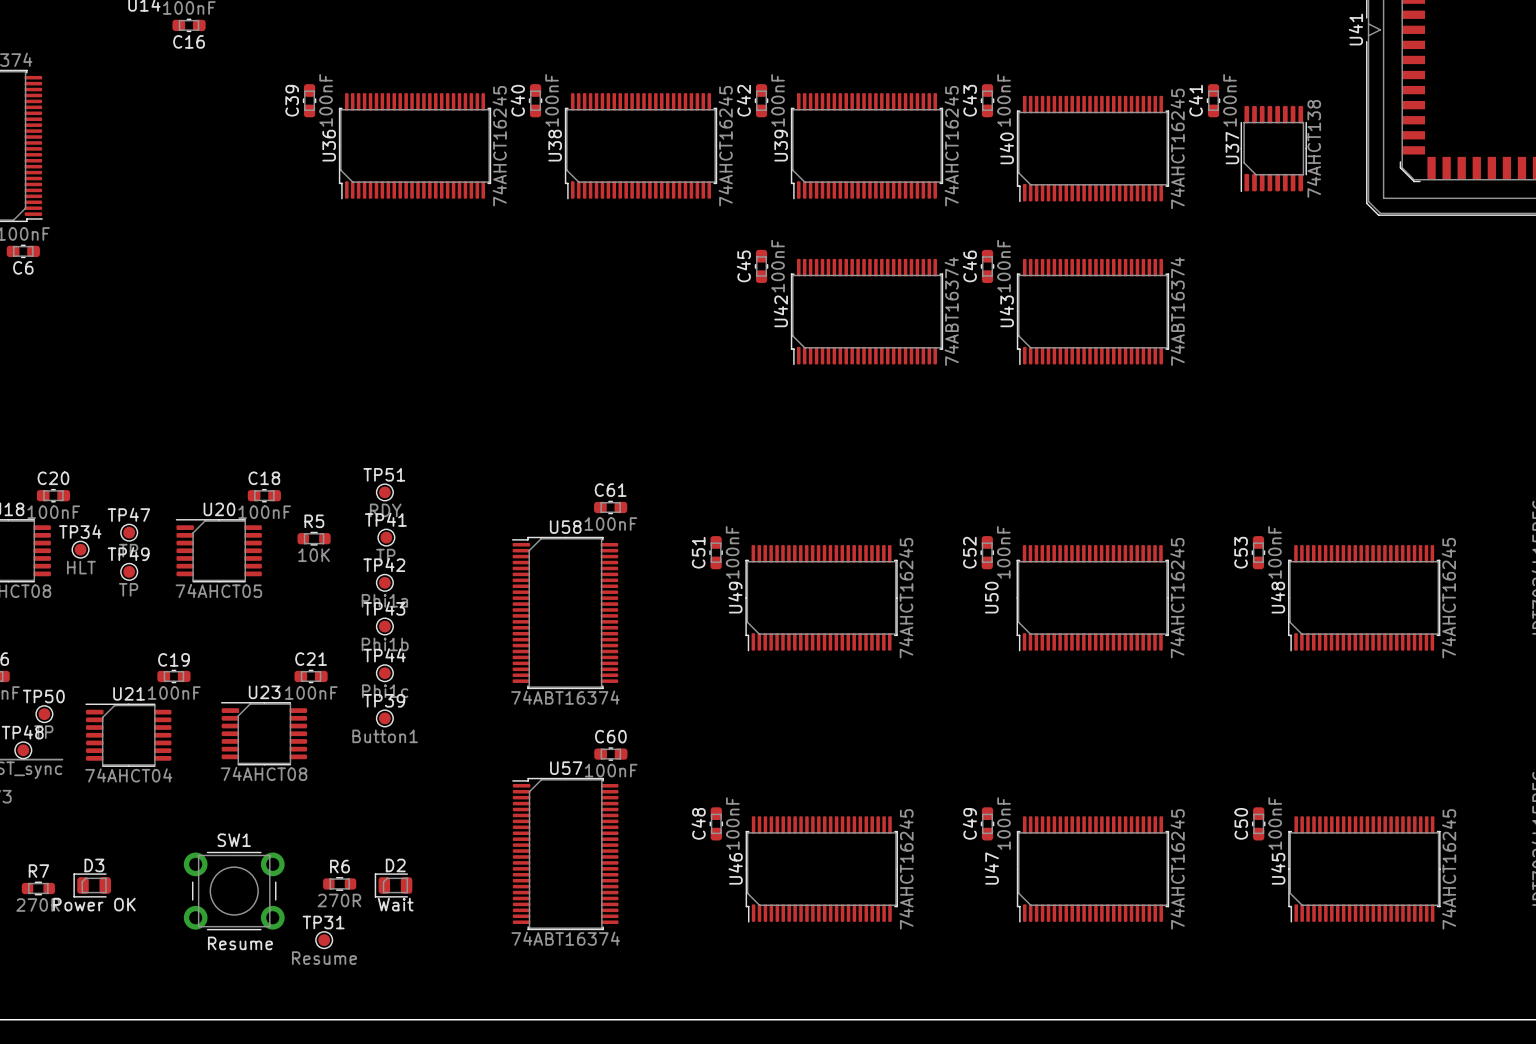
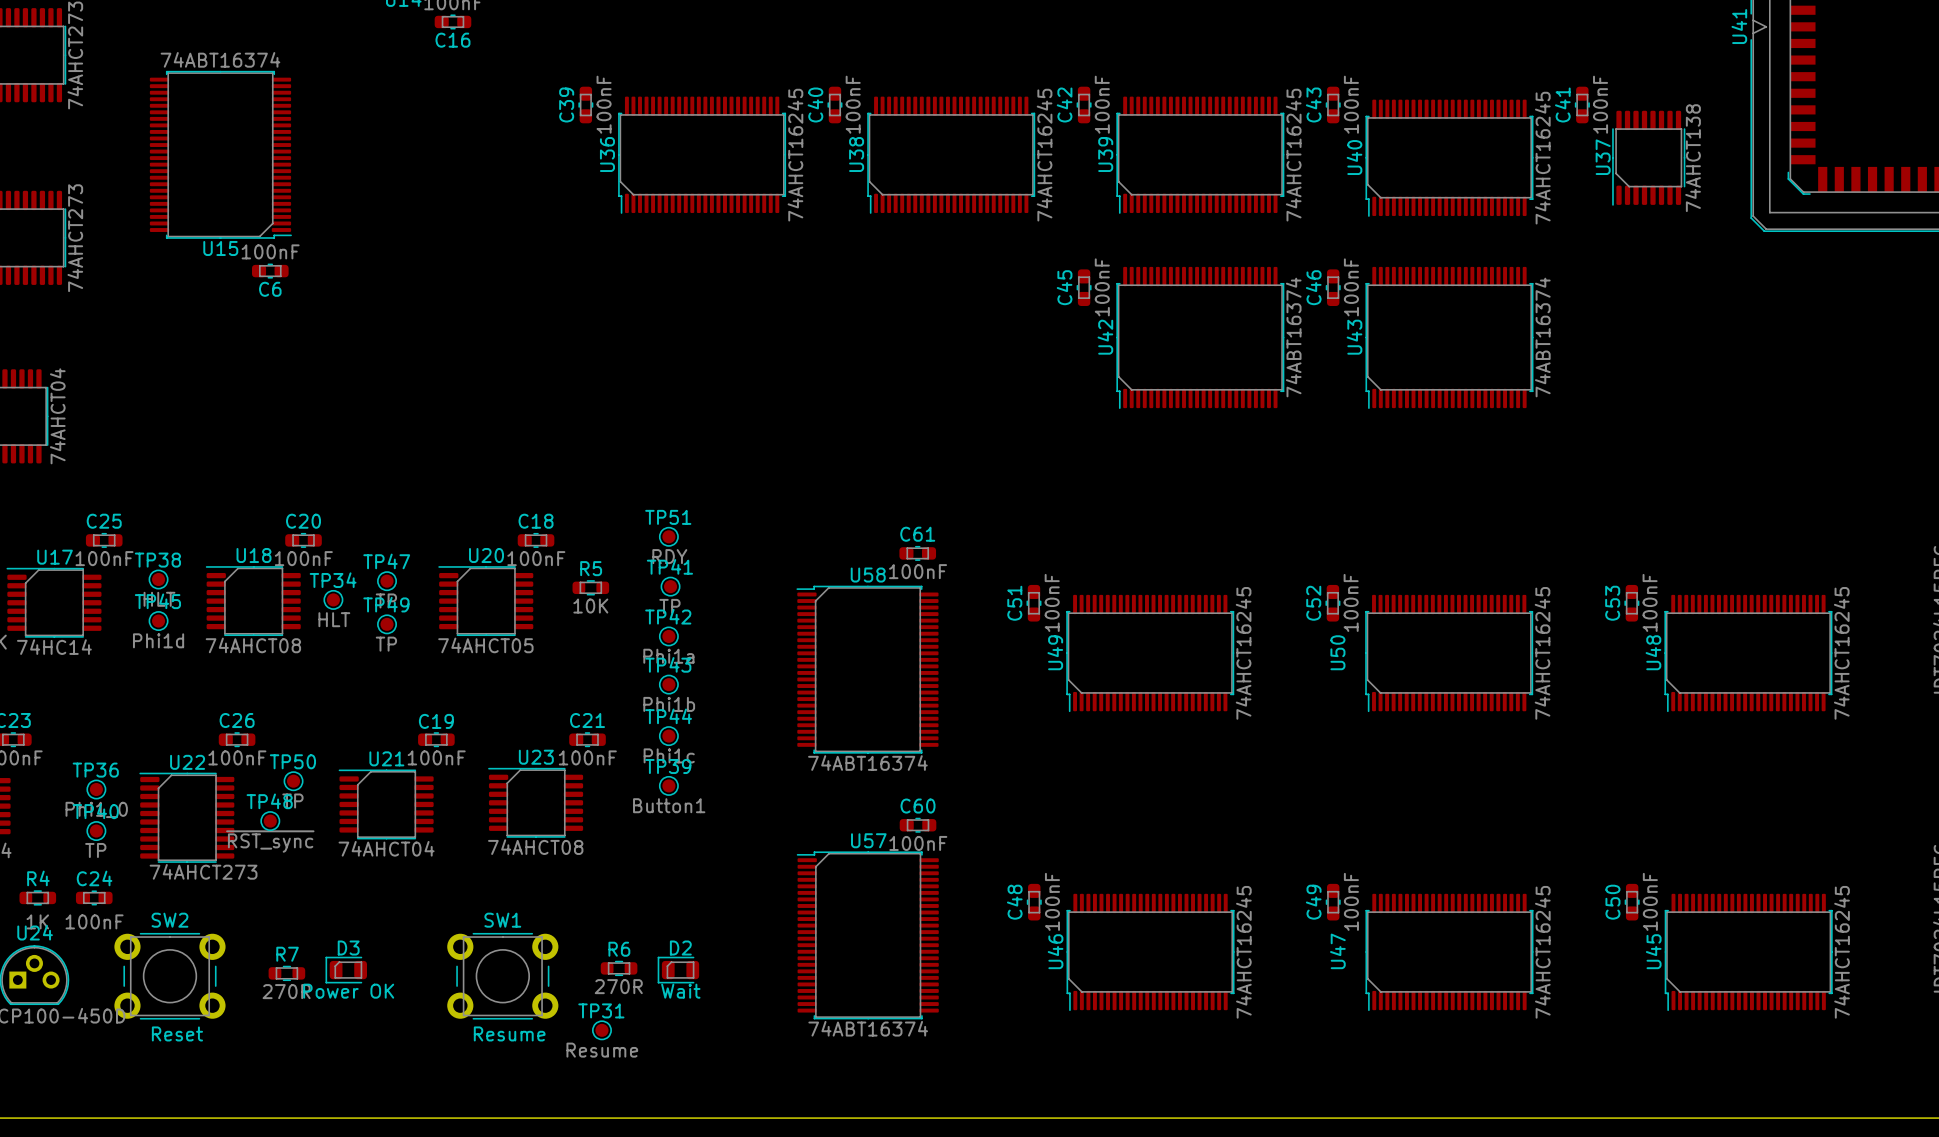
U42 footprint: [790, 258, 944, 366] -> [1116, 266, 1285, 409]
U43 footprint: [1016, 258, 1170, 366] -> [1365, 266, 1534, 409]
U58 footprint: [511, 536, 619, 690] -> [796, 585, 939, 754]
U57 footprint: [512, 777, 619, 931] -> [796, 851, 939, 1020]

